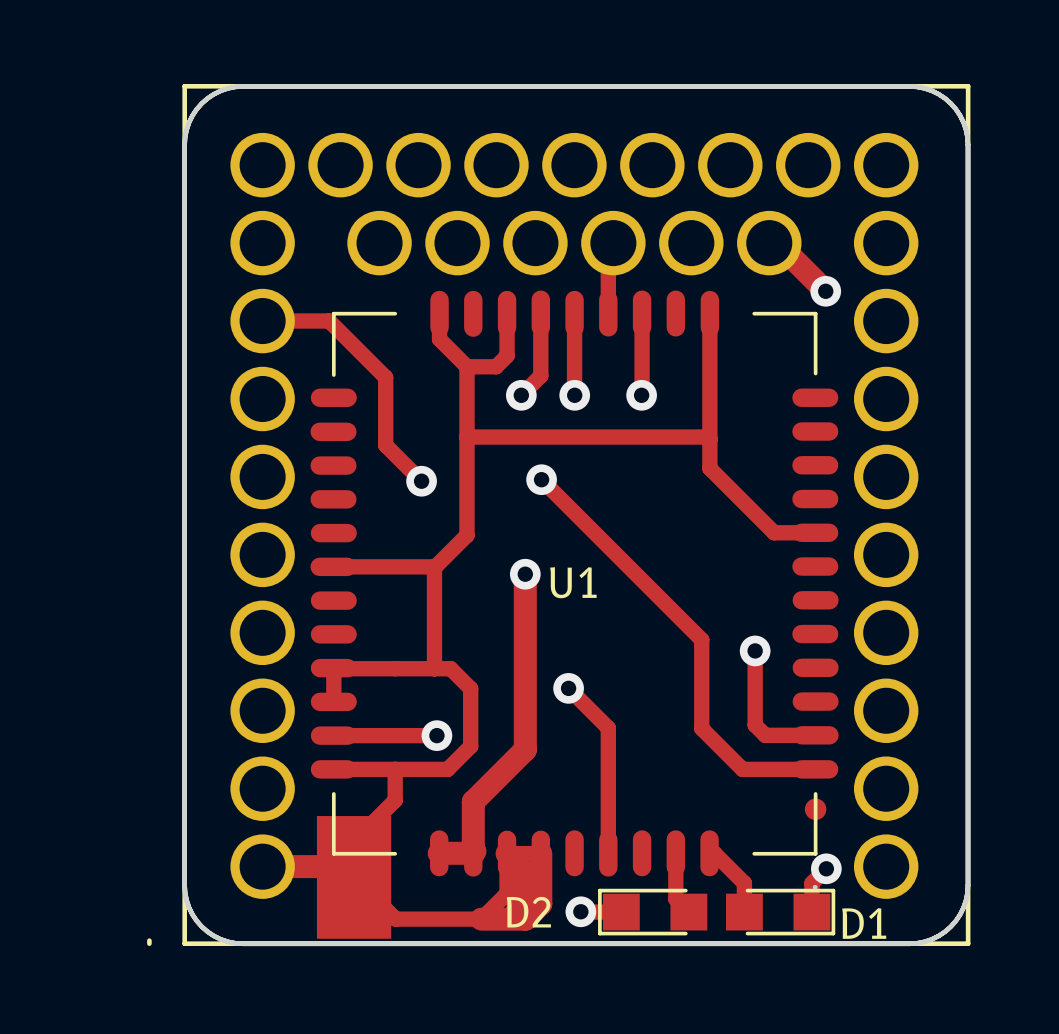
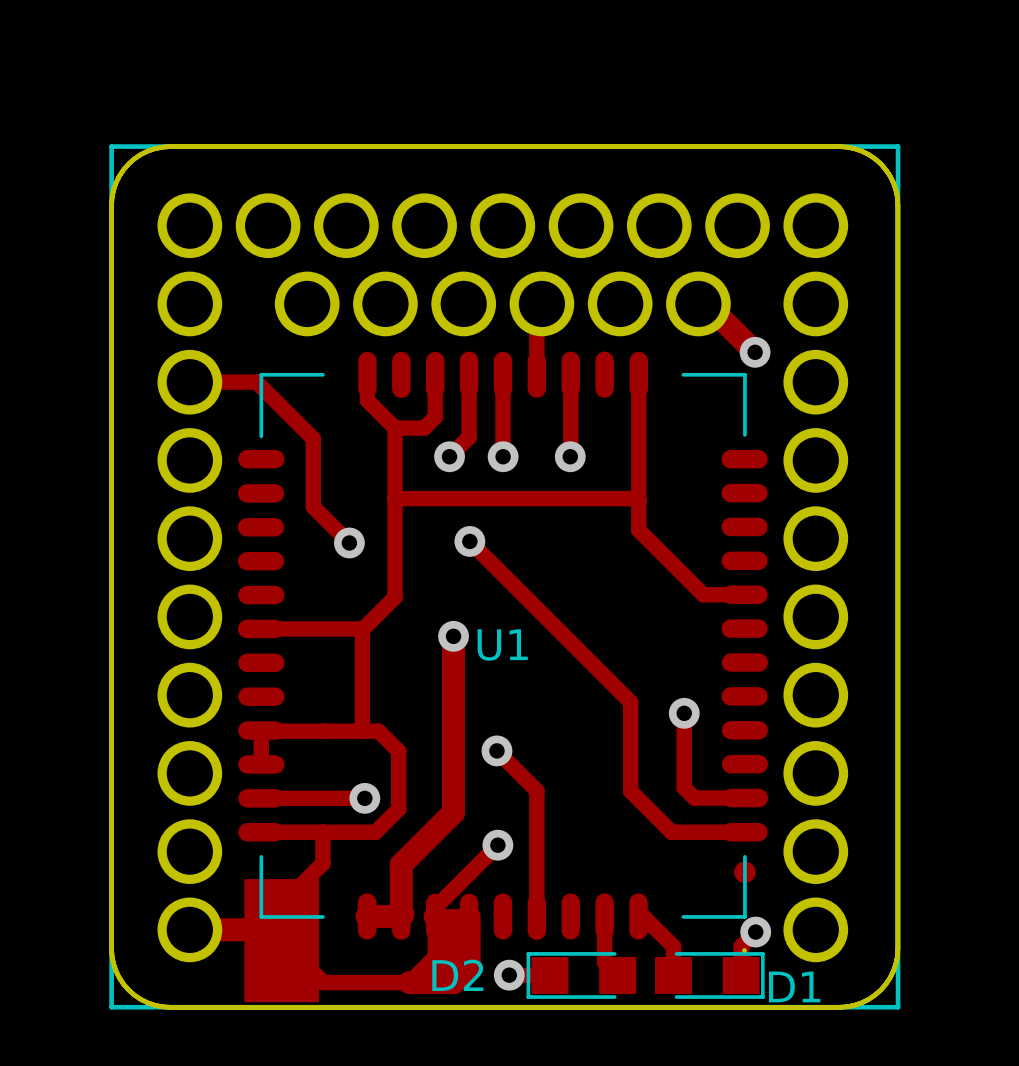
track: none -> (497, 845) (435, 907) (435, 916)
via: none -> (497, 845)
line: (149, 940) (149, 943) -> none

